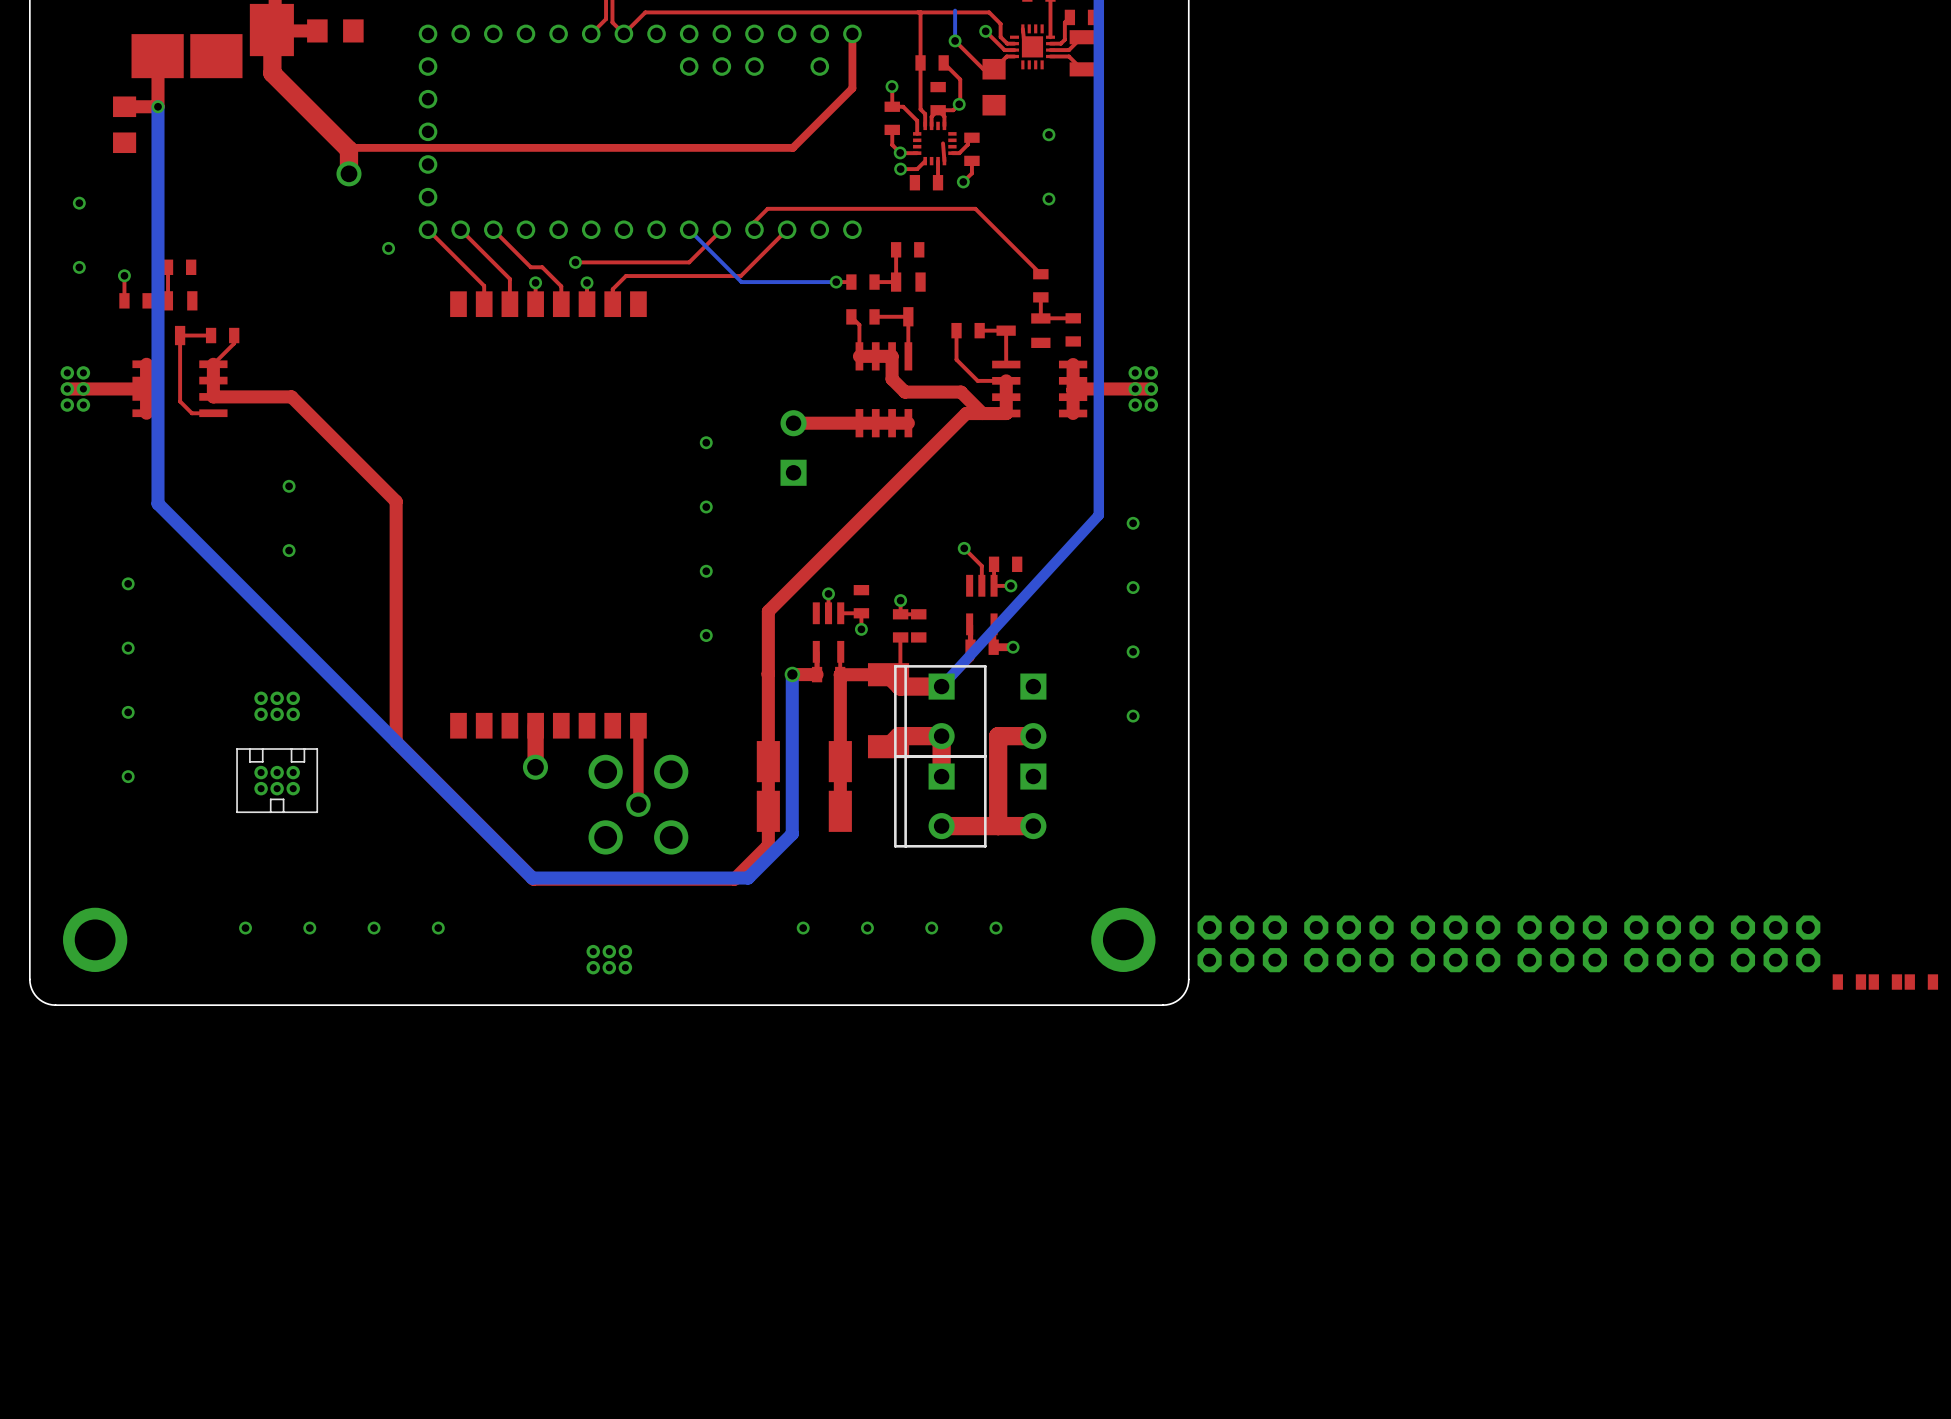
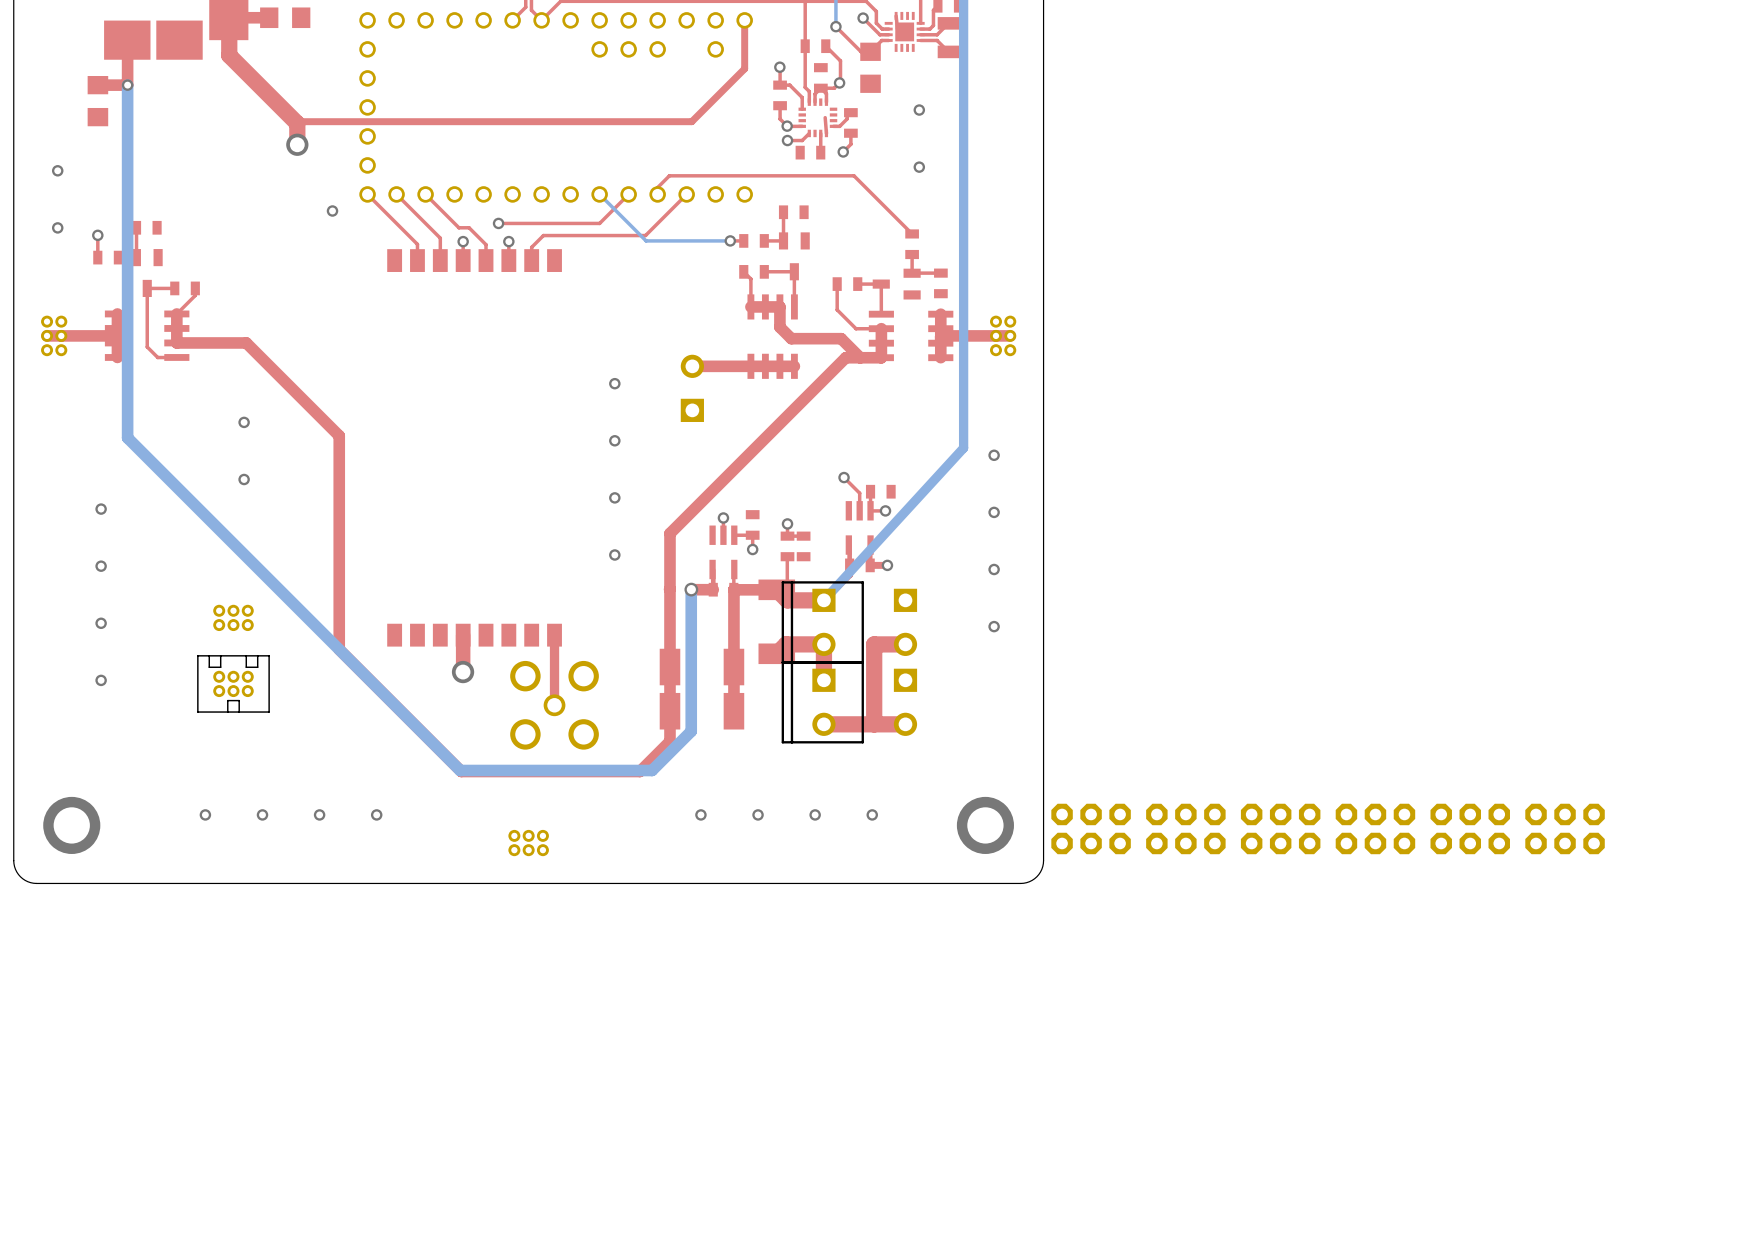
part: (1849, 982) -> none
part: (1885, 982) -> none
part: (1921, 982) -> none

